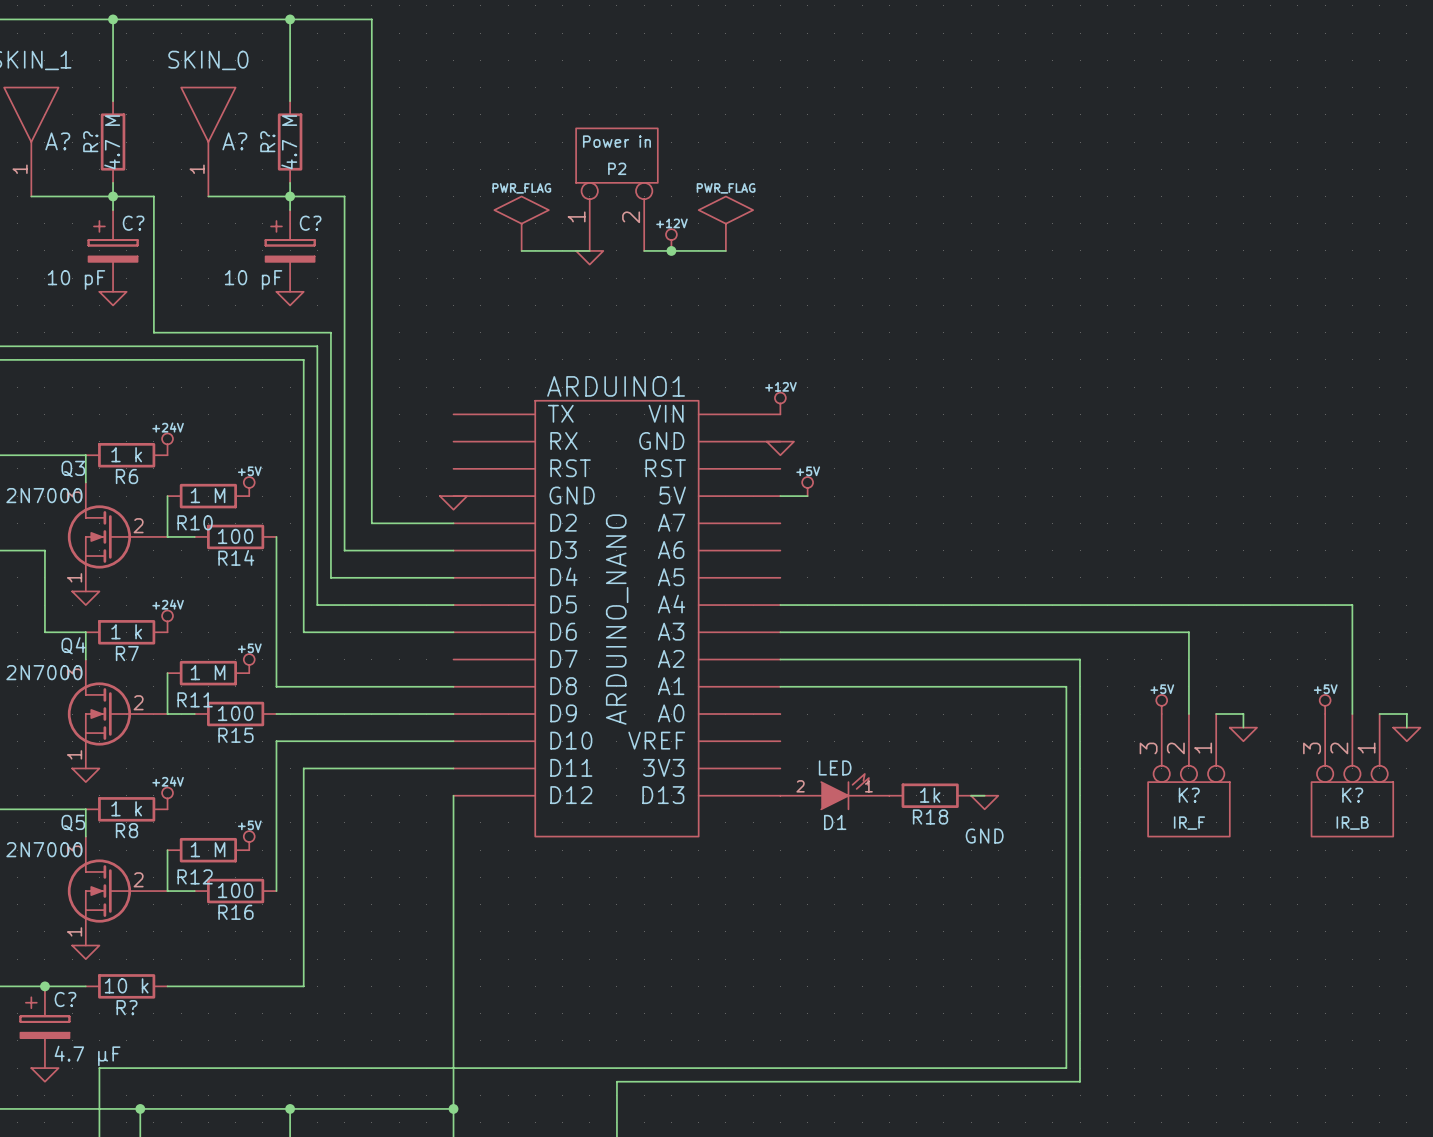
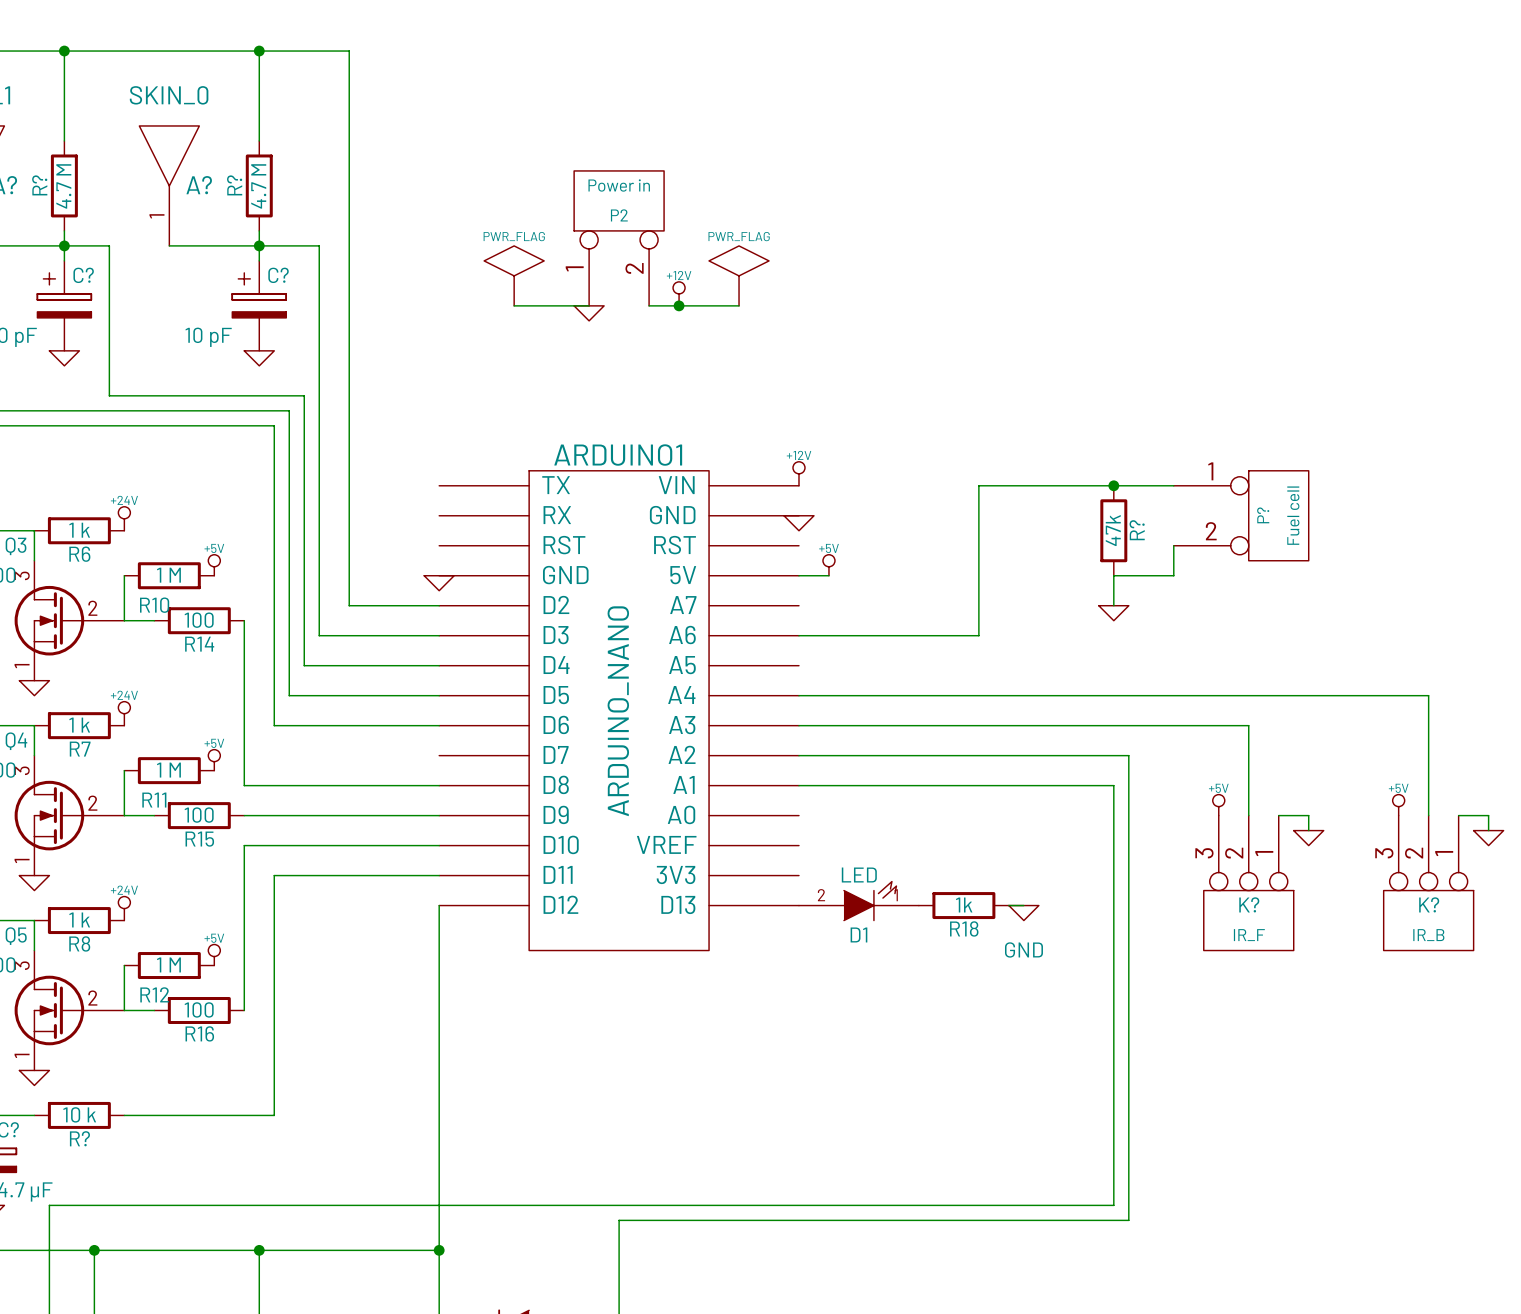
junction: none -> (1113, 485)
wire: none -> (1173, 485) (978, 485) (978, 635) (798, 635)
P?: none -> Fuel cell (1241, 515)
R?: none -> 47k (1113, 530)
wire: none -> (1173, 545) (1173, 575) (1113, 575) (1113, 605)
power symbol: none -> (1113, 613)

